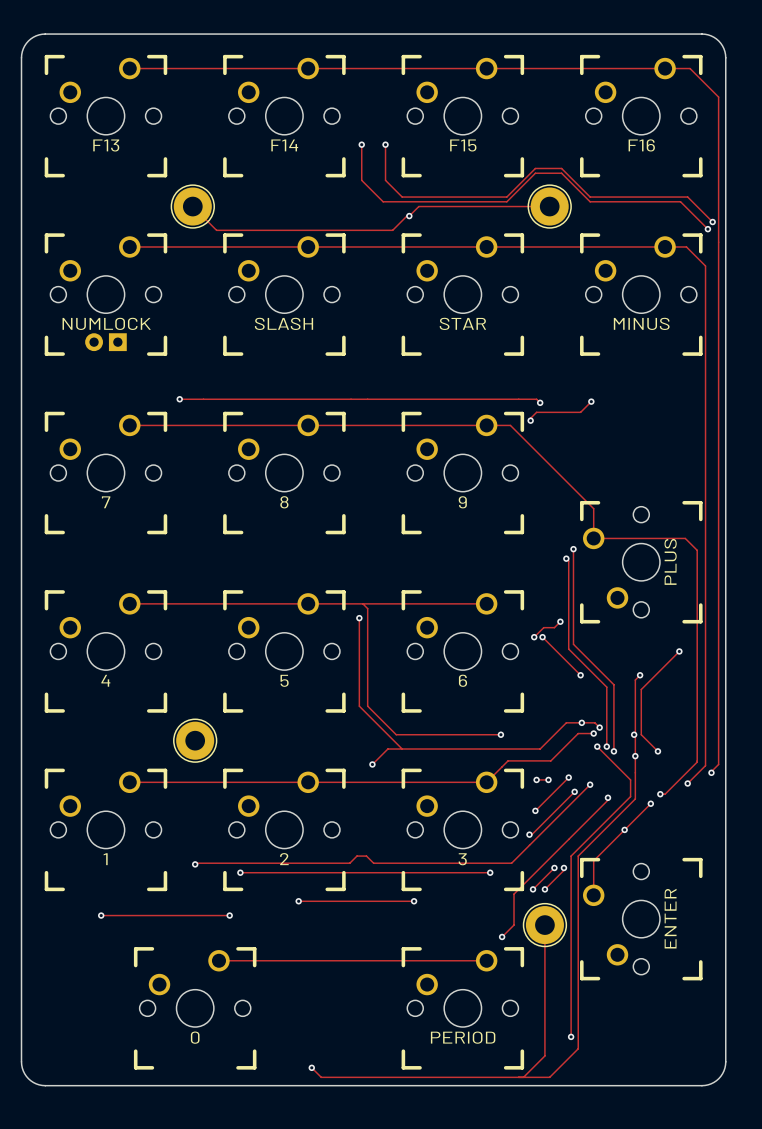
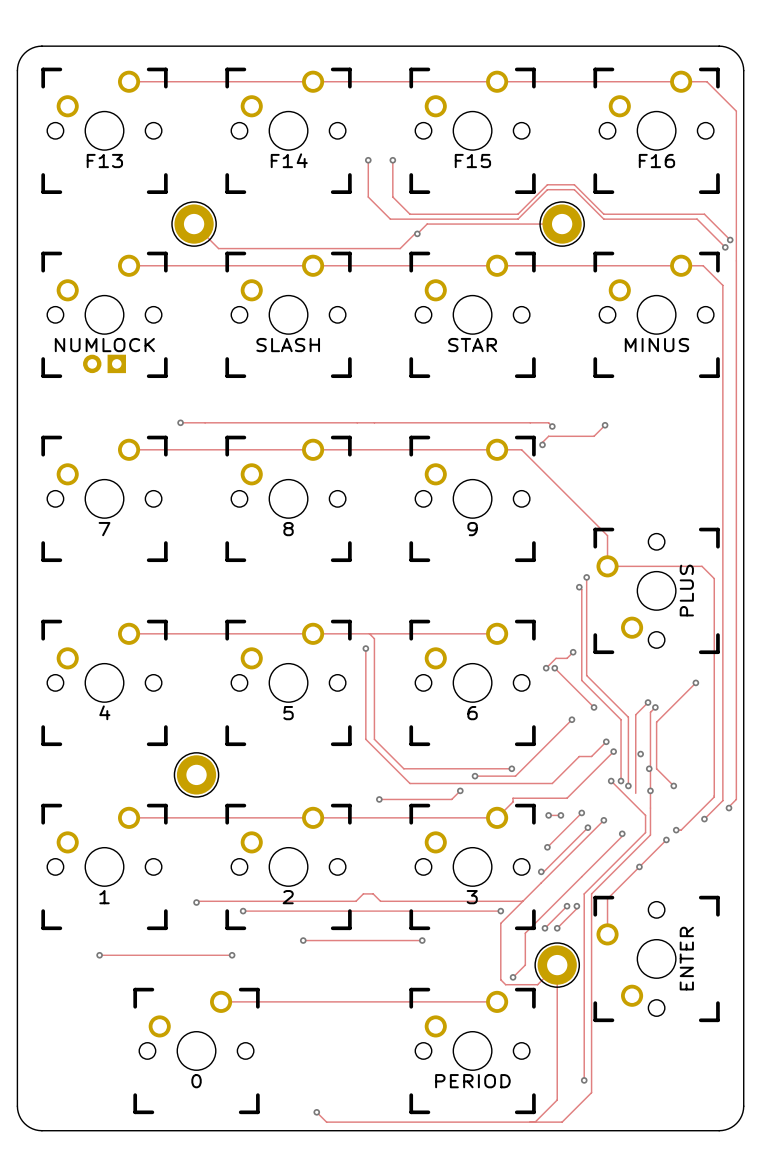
track: none -> (648, 702) (635, 714) (635, 793)
via: none -> (648, 702)
track: none -> (571, 719) (515, 776) (475, 776)
via: none -> (571, 719)
via: none -> (606, 741)
via: none -> (613, 751)
via: none -> (640, 754)
track: (578, 722) (594, 722) (599, 727) -> (591, 756) (606, 741)
via: (581, 722) -> none
via: (599, 727) -> none
track: (593, 733) (578, 733) (550, 760) (508, 760) (502, 766) -> (613, 751) (567, 798) (513, 798) (513, 801)
via: (593, 733) -> none
via: none -> (475, 776)
track: (402, 749) (387, 749) (372, 764) -> (460, 790) (451, 799) (379, 799)
via: none -> (460, 790)
track: none -> (522, 901) (500, 923) (500, 979) (505, 984) (537, 984) (557, 965)

